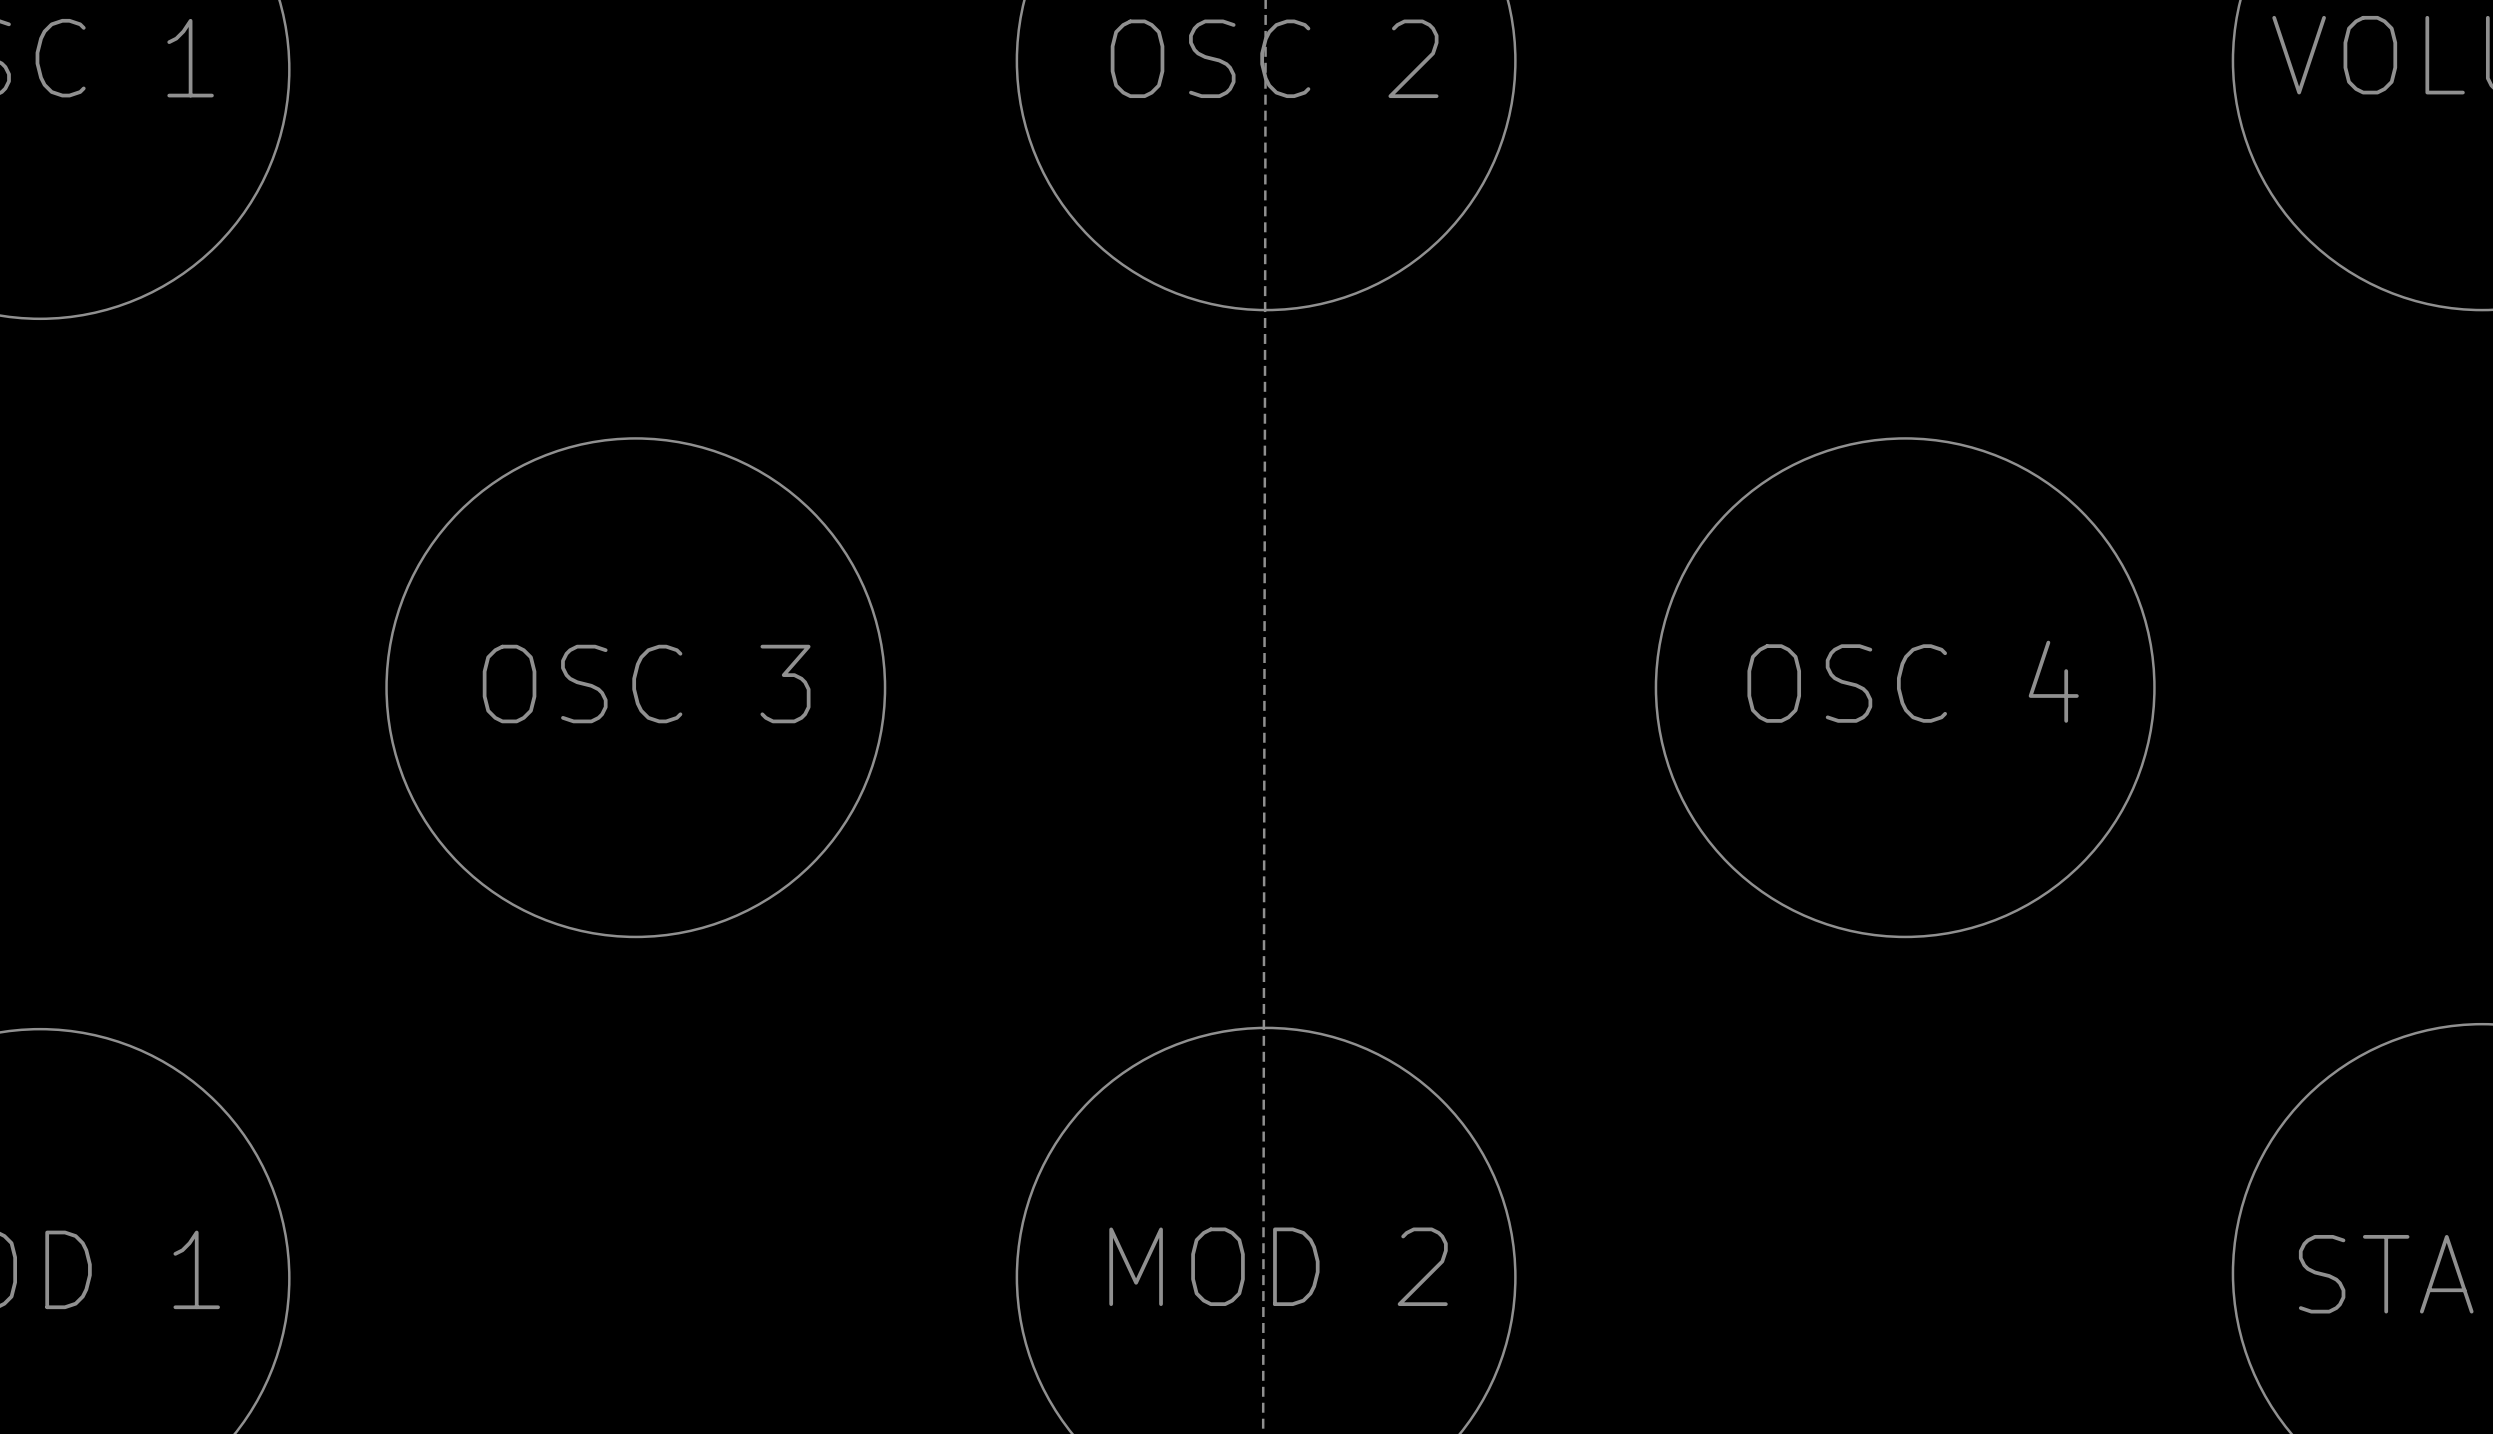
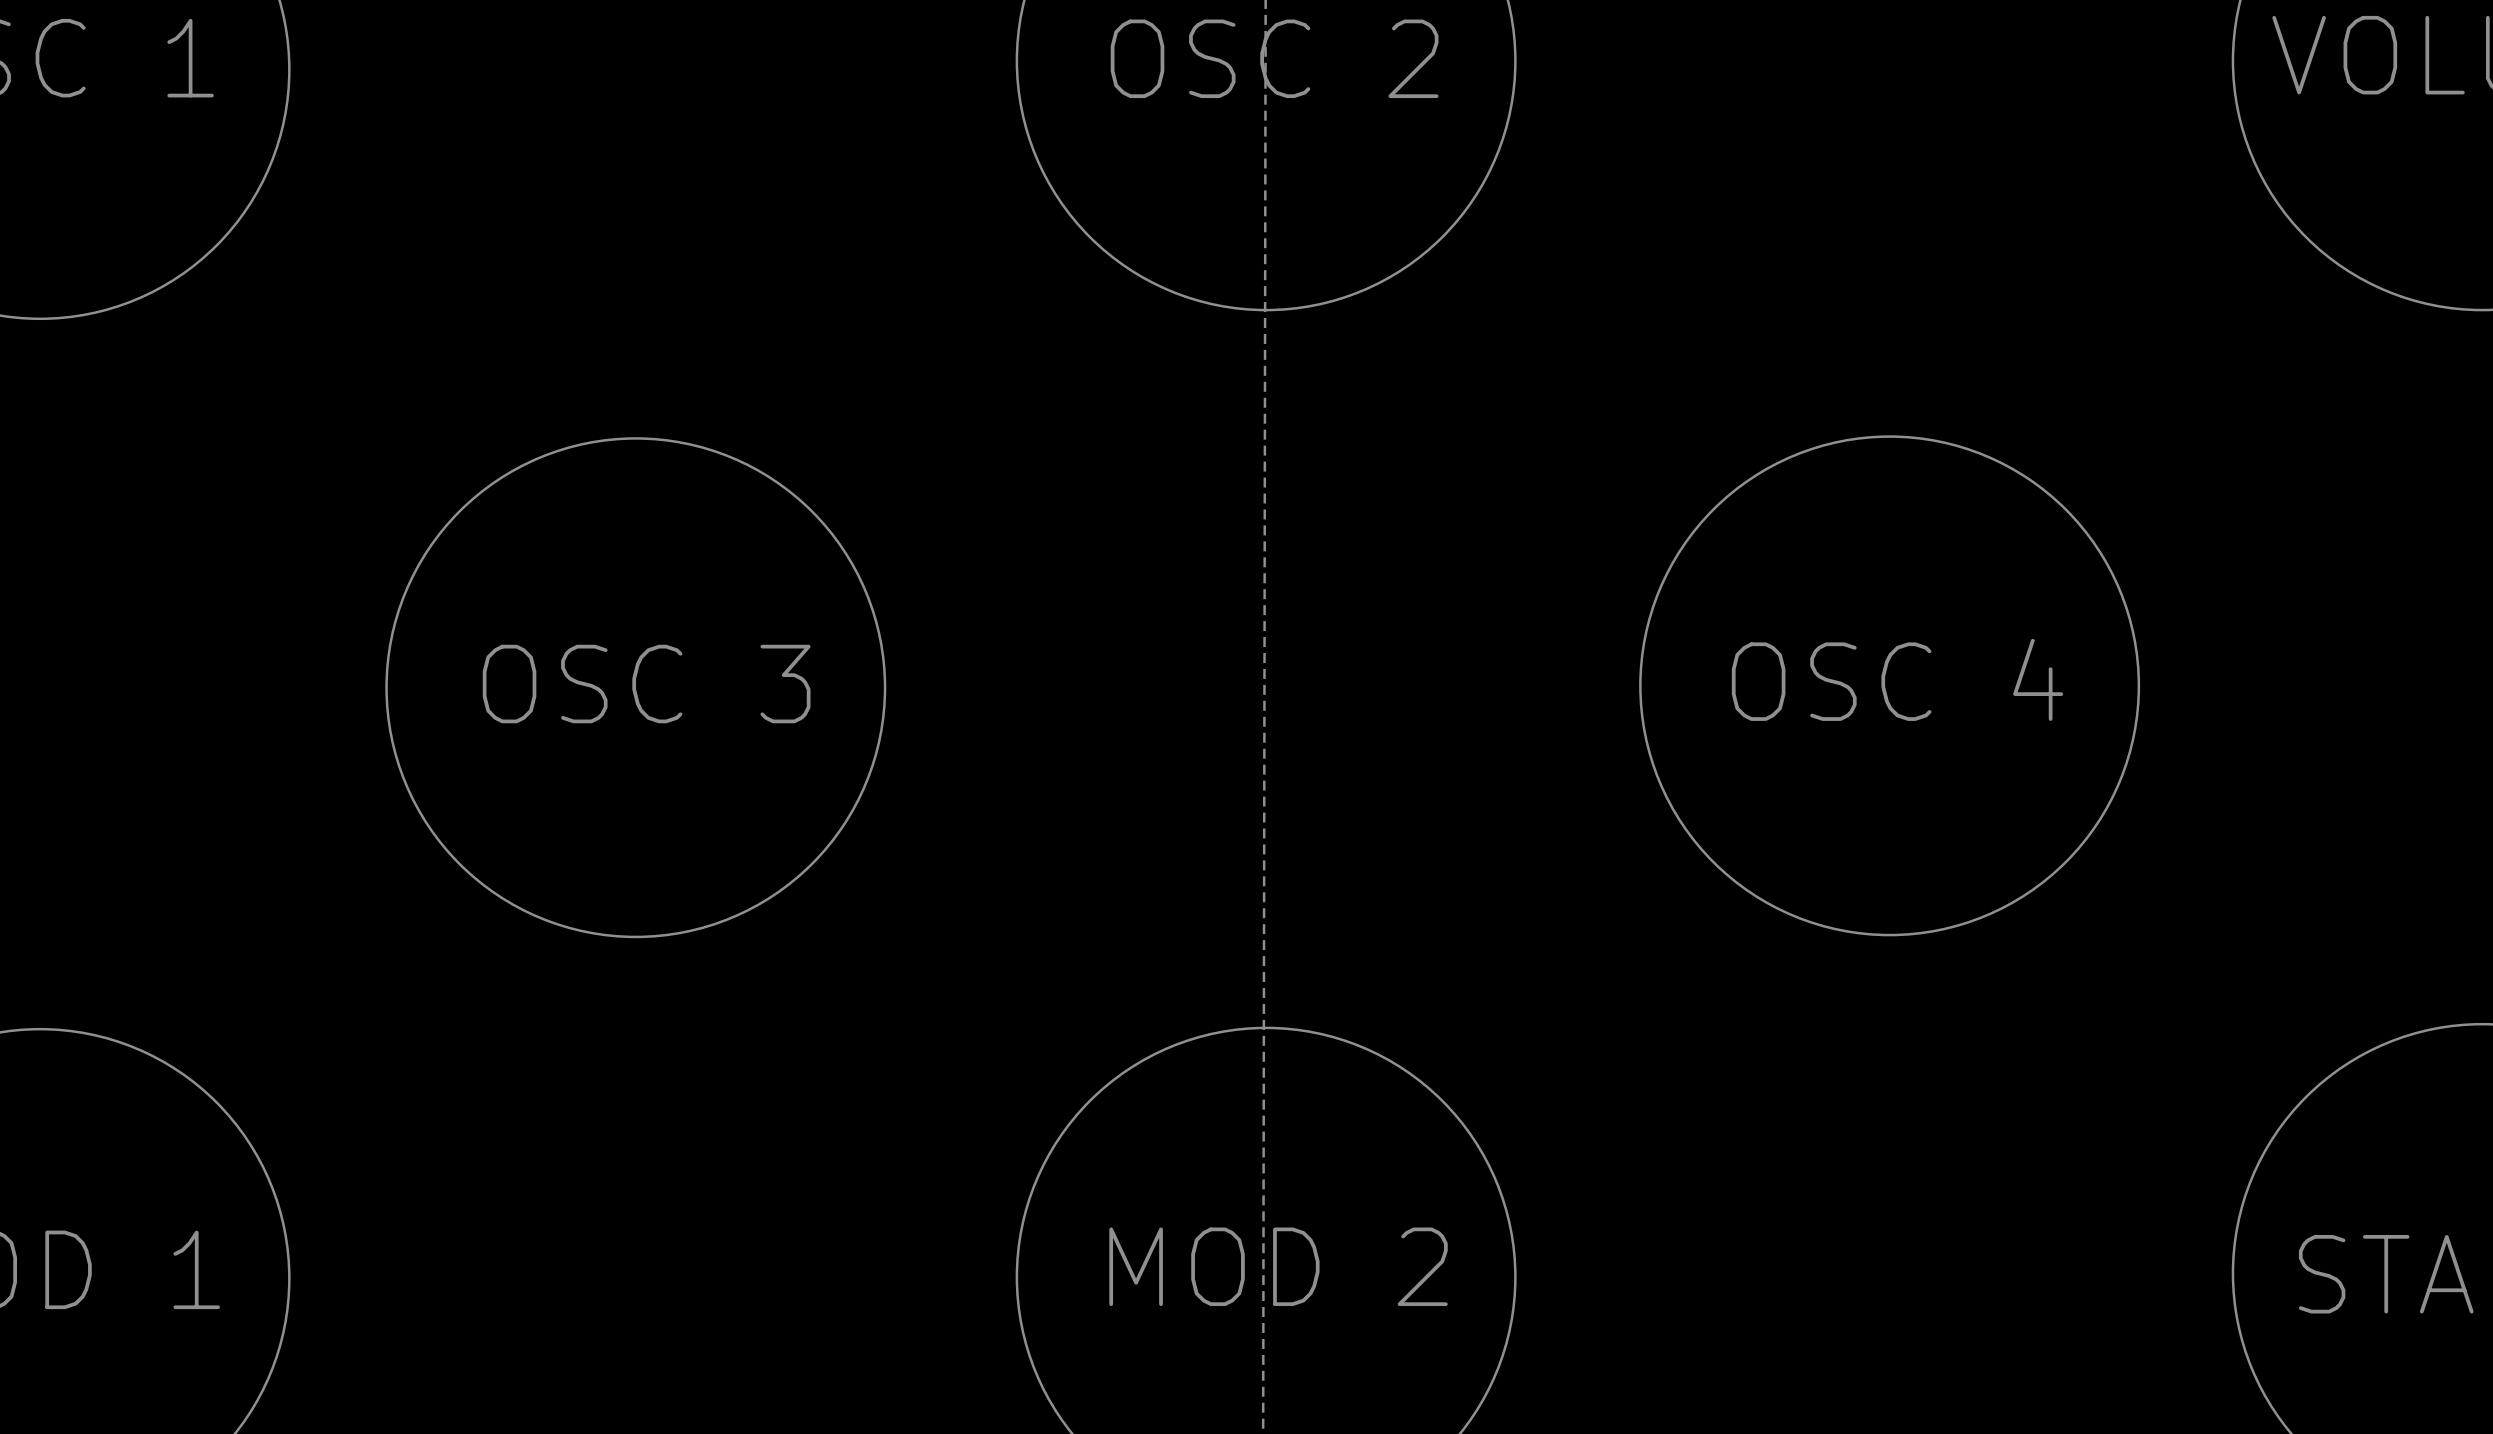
text position: OSC 4 (1913, 681) -> OSC 4 (1897, 679)
drawing position: (1905, 687) -> (1889, 685)

